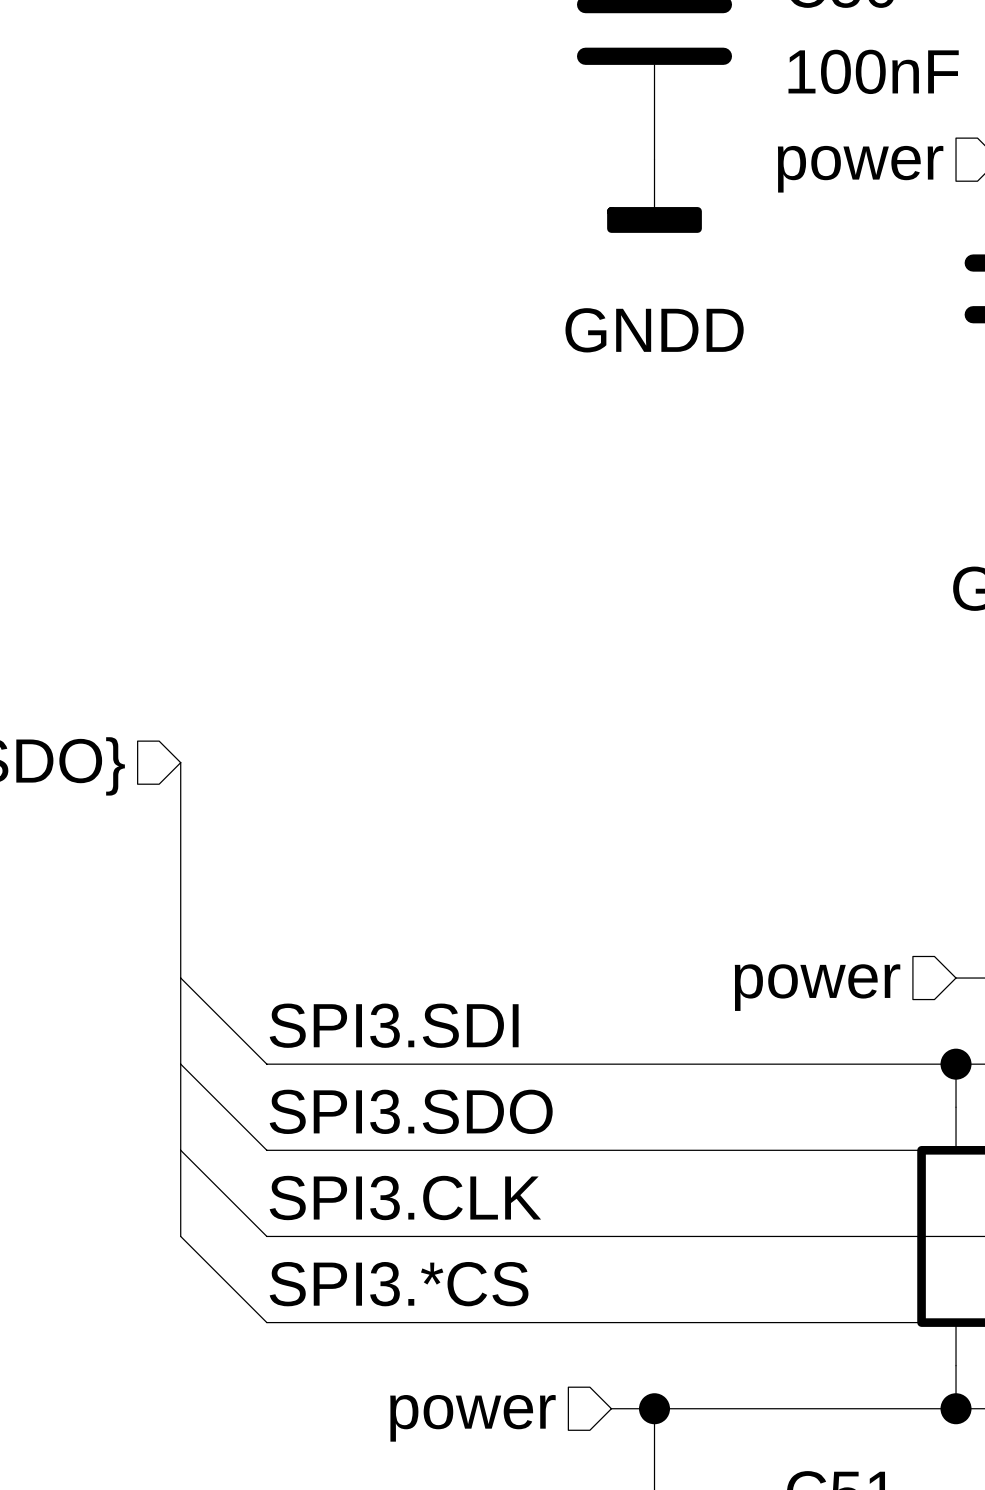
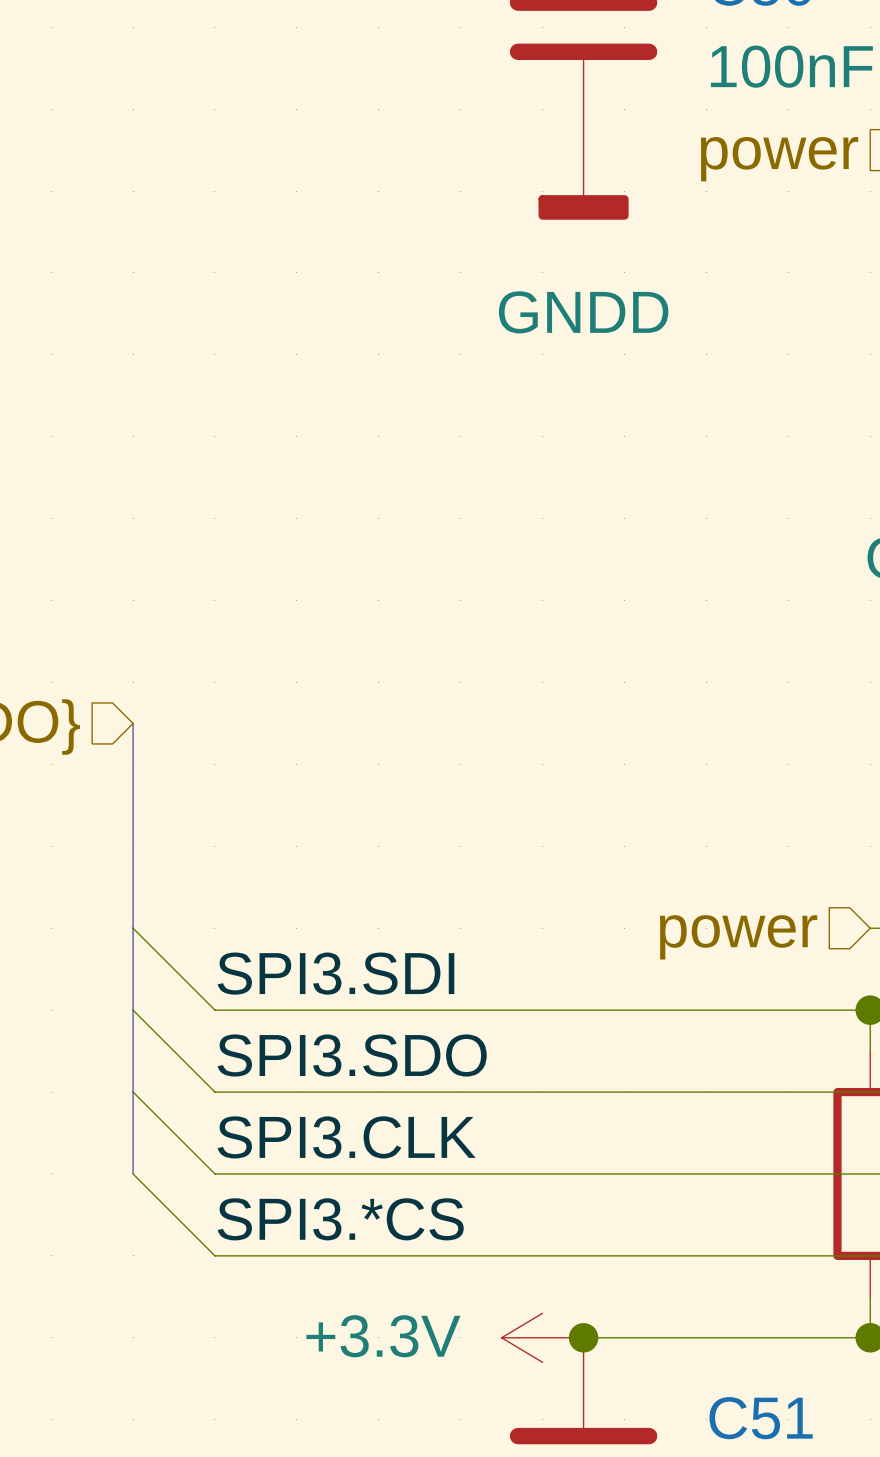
power symbol: none -> +3.3V (542, 1337)
hierarchical label: power (472, 1418) -> none

